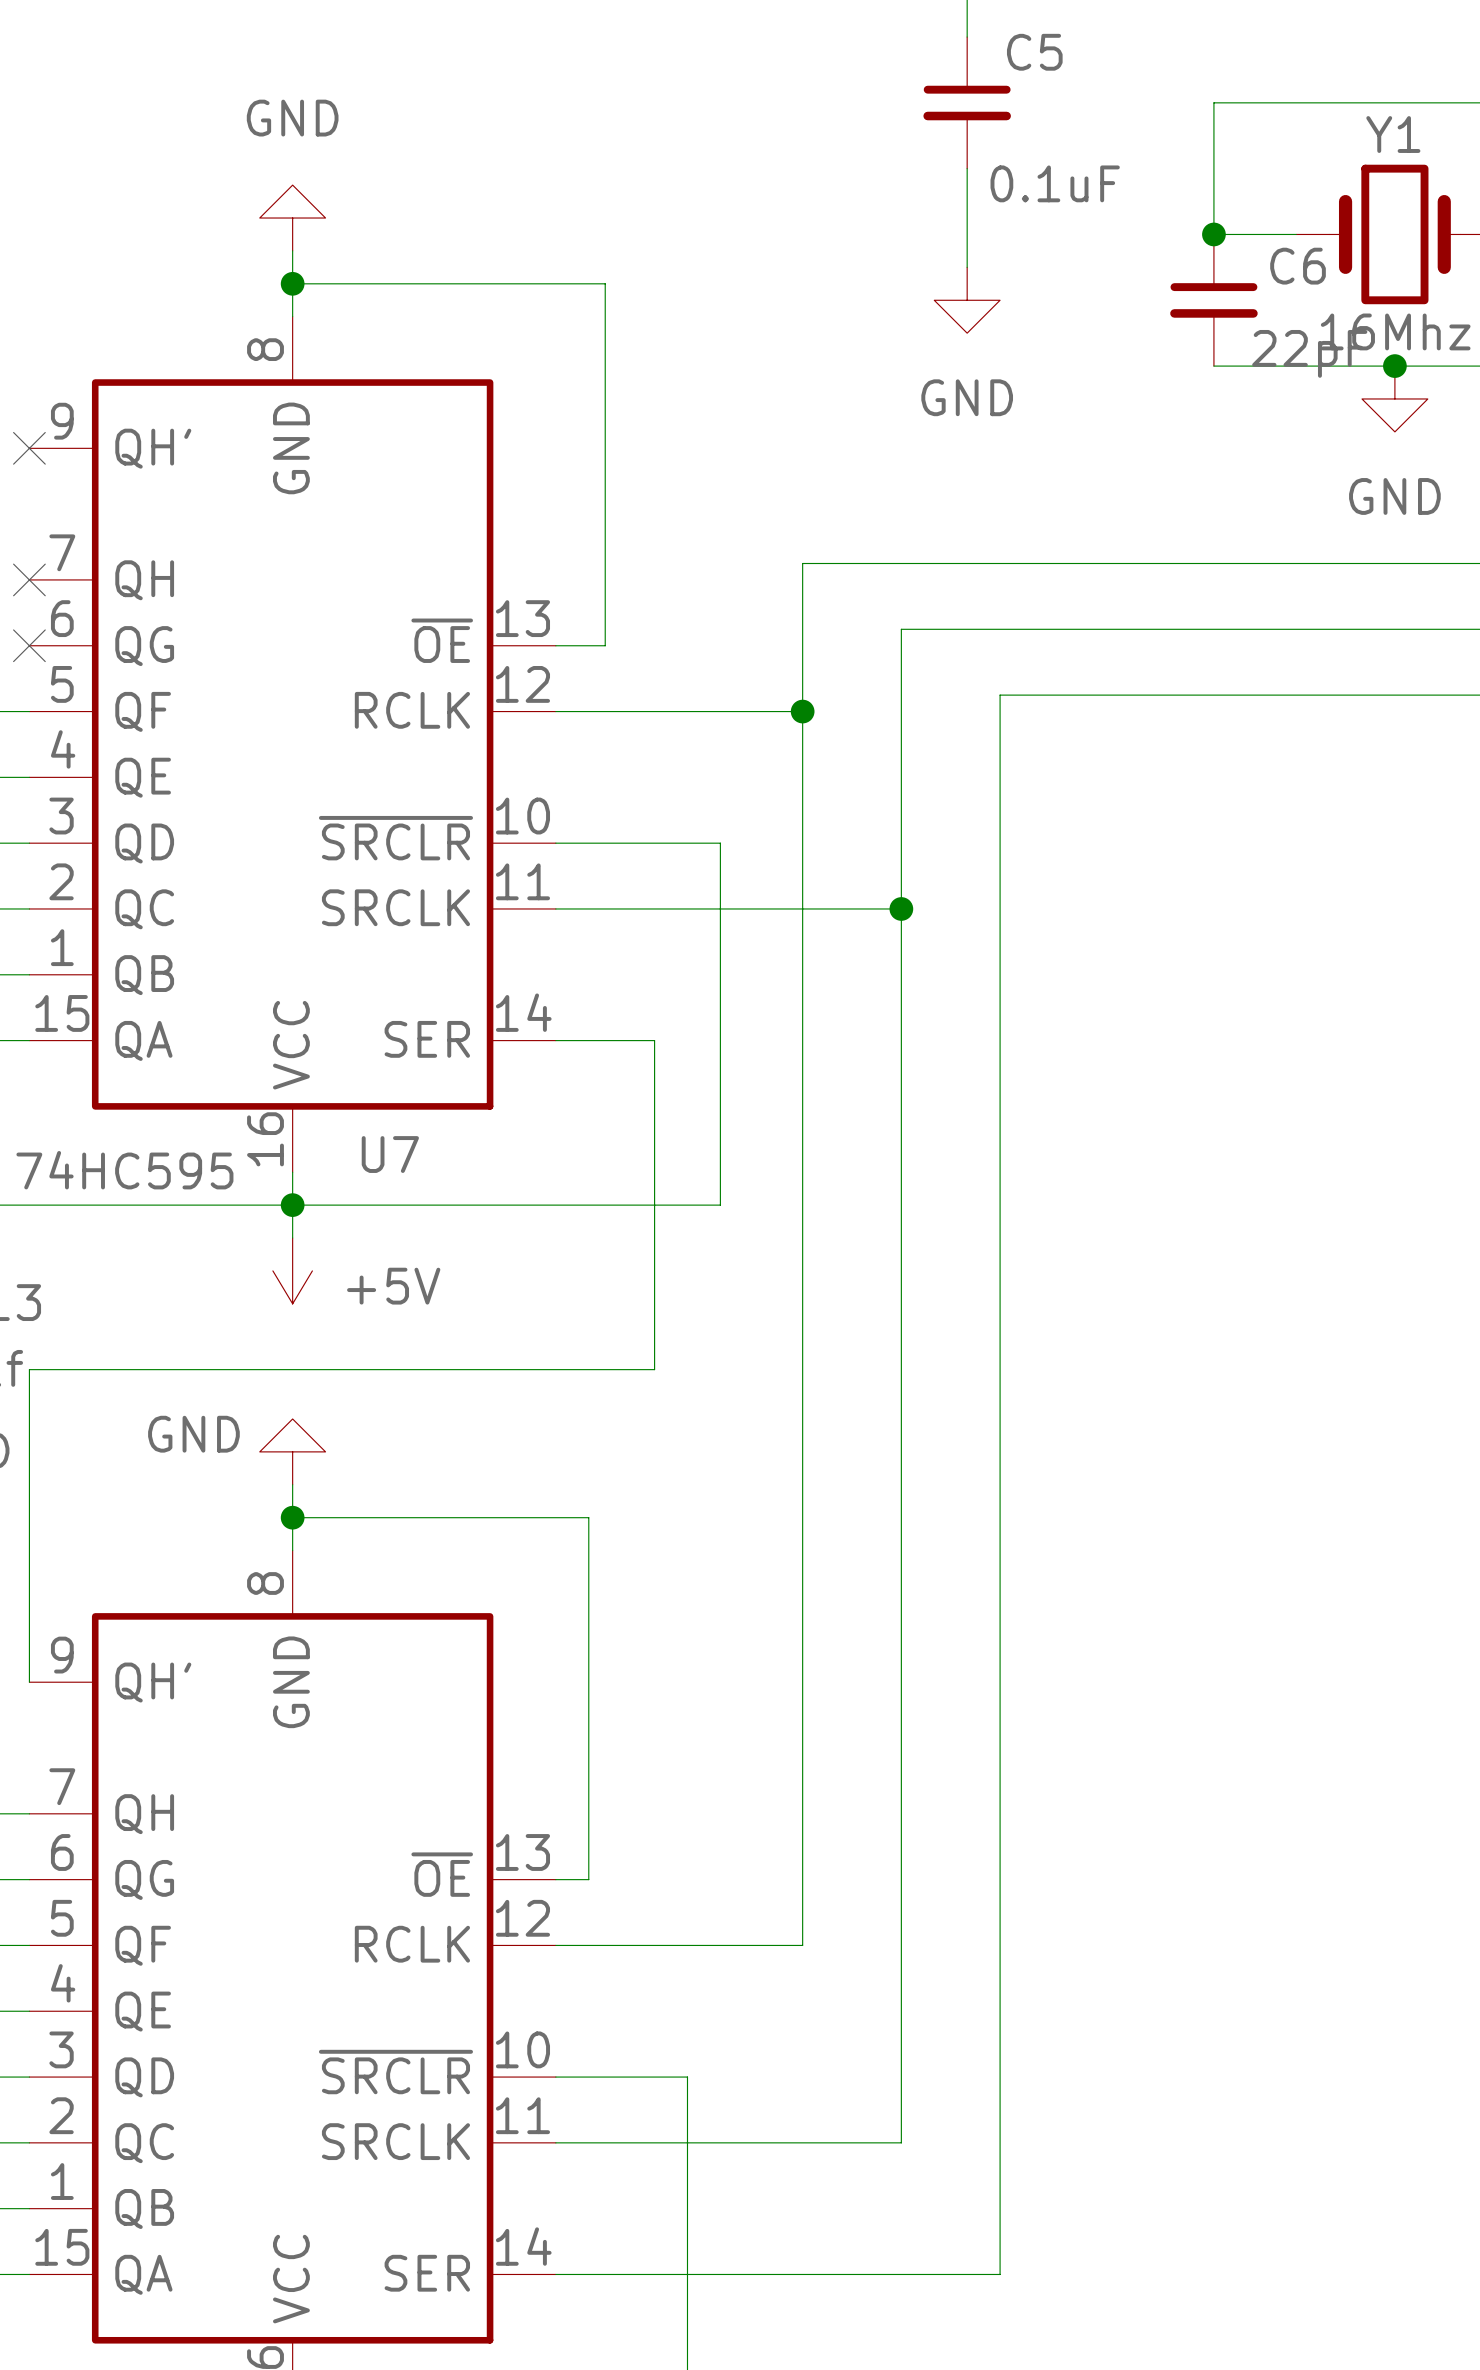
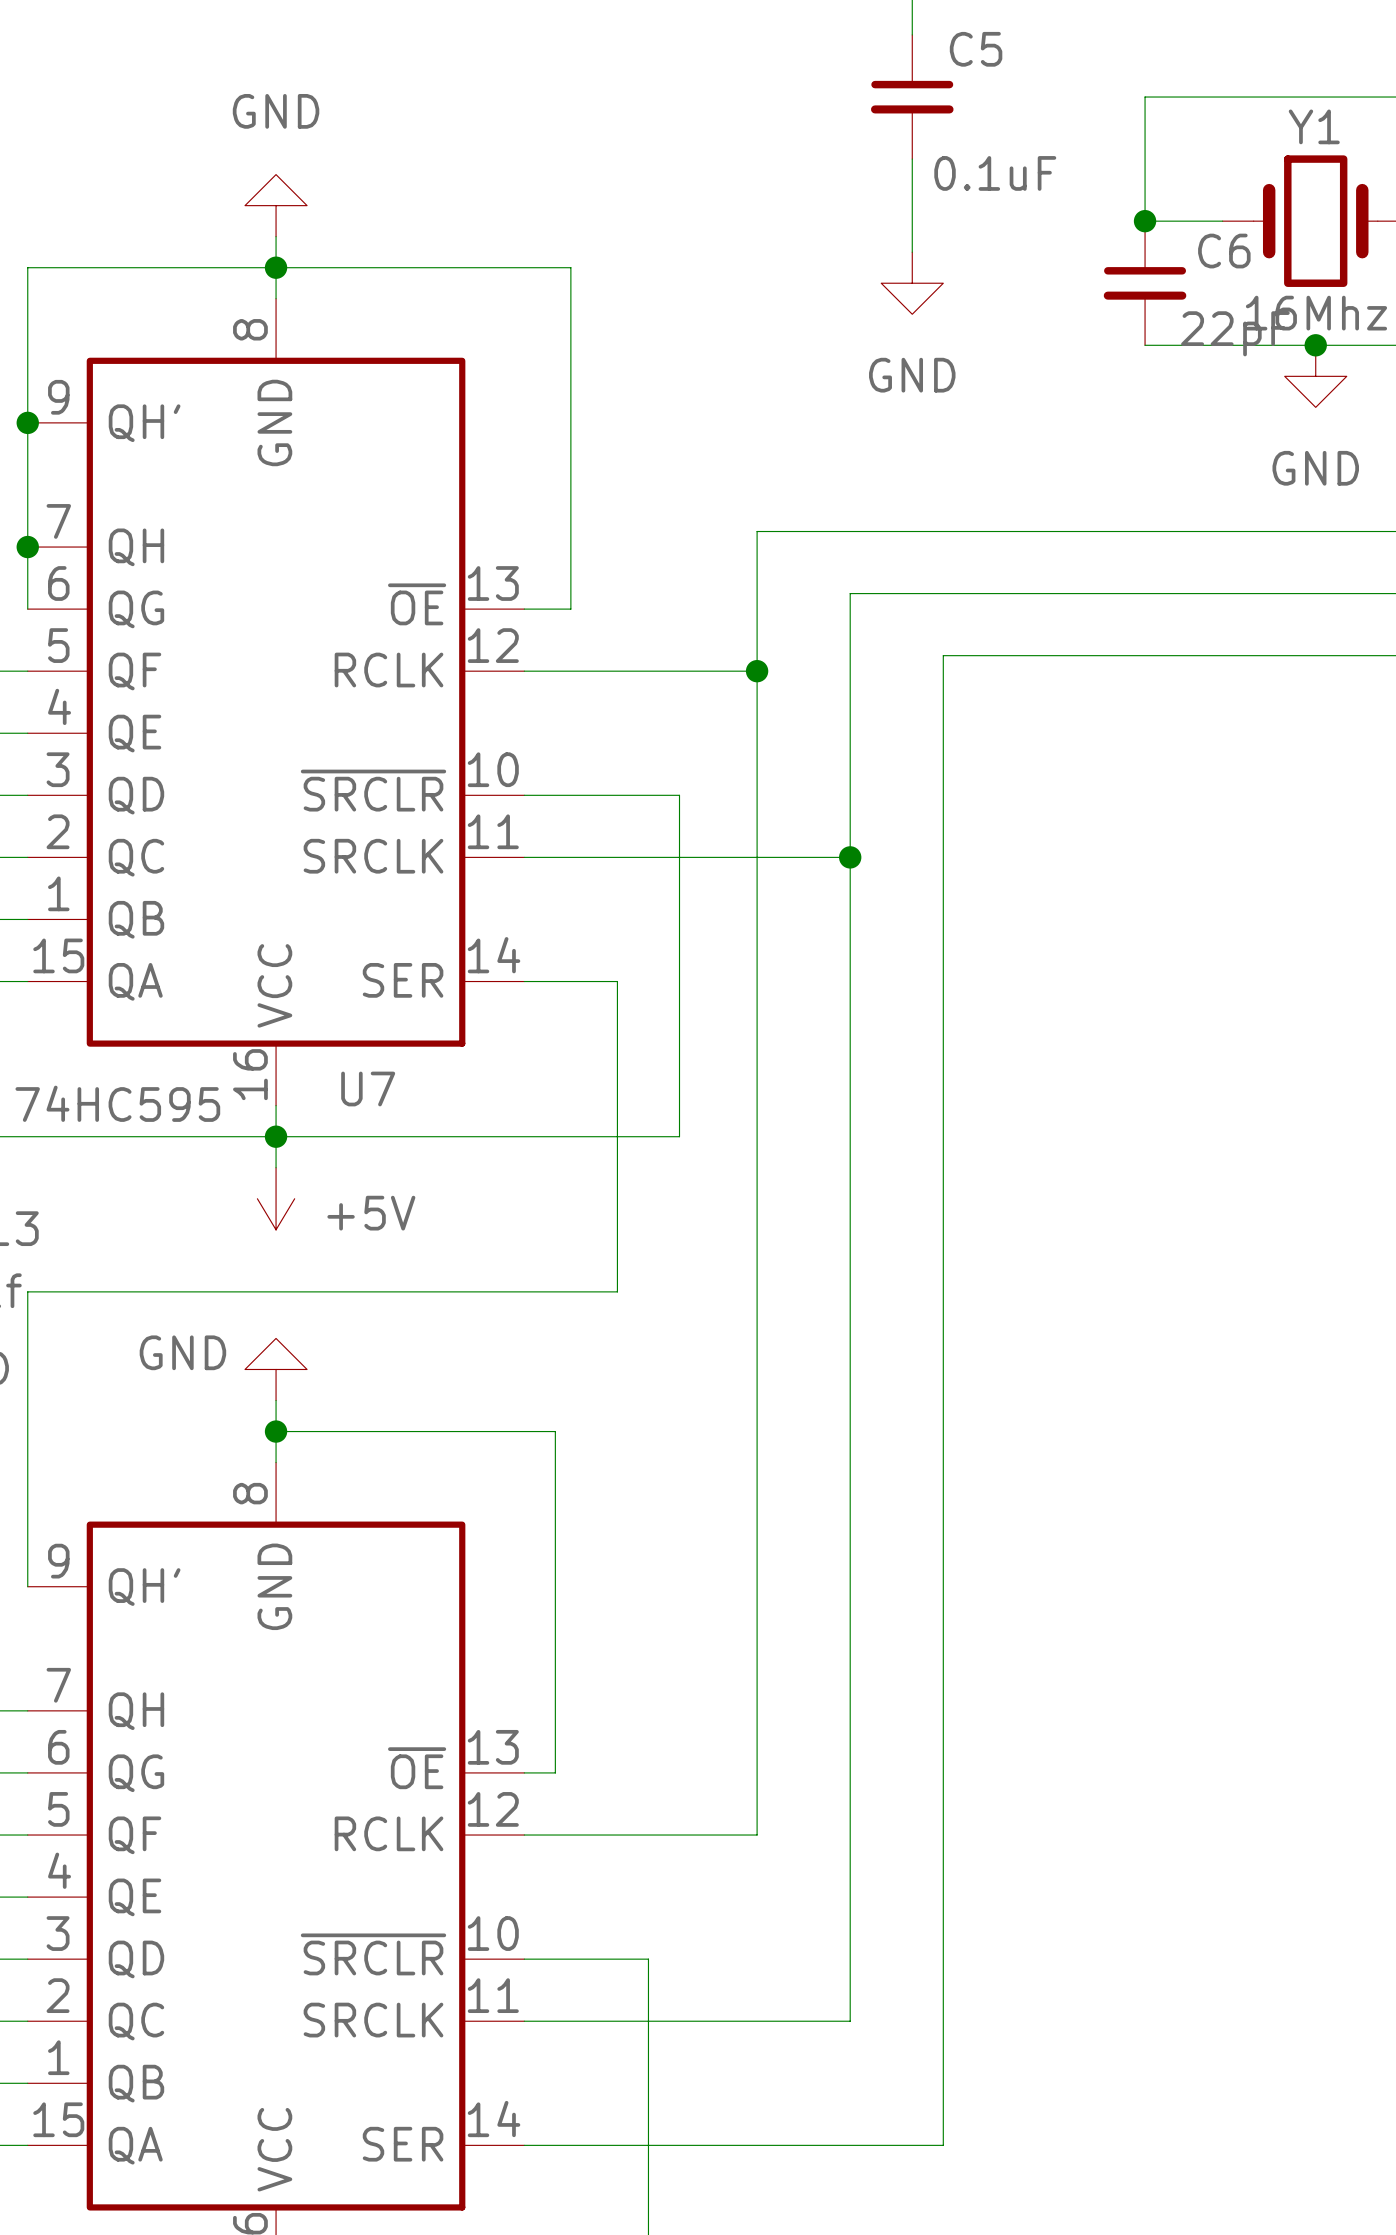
wire: none -> (276, 267) (27, 267) (27, 609)
no-connect mark: (29, 448) -> none
junction: none -> (27, 422)
no-connect mark: (29, 579) -> none
junction: none -> (27, 547)
no-connect mark: (29, 645) -> none

